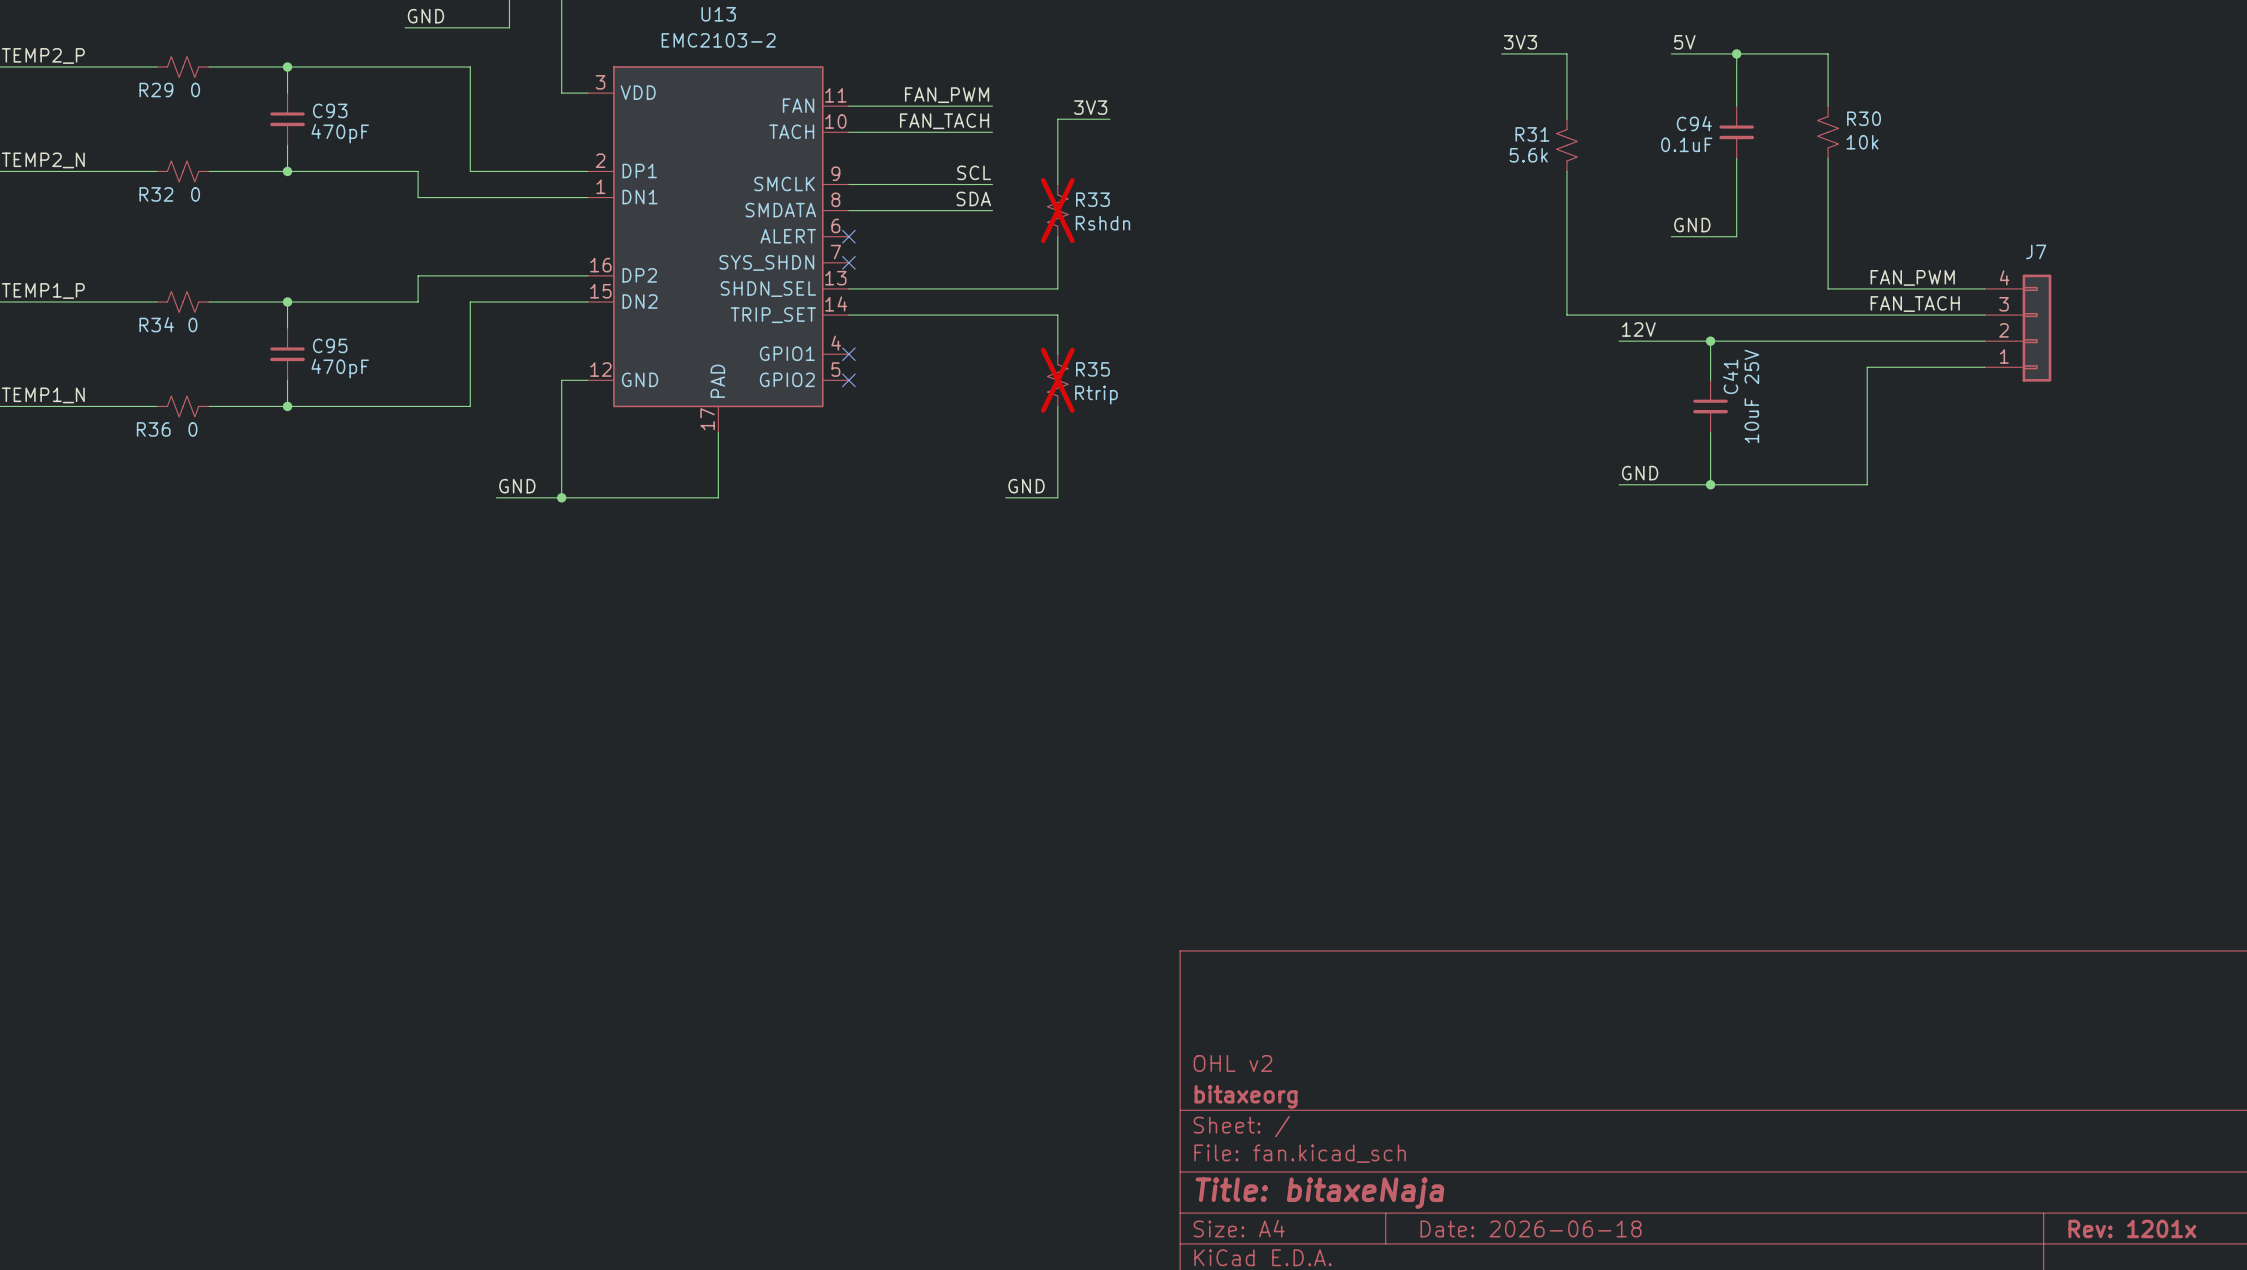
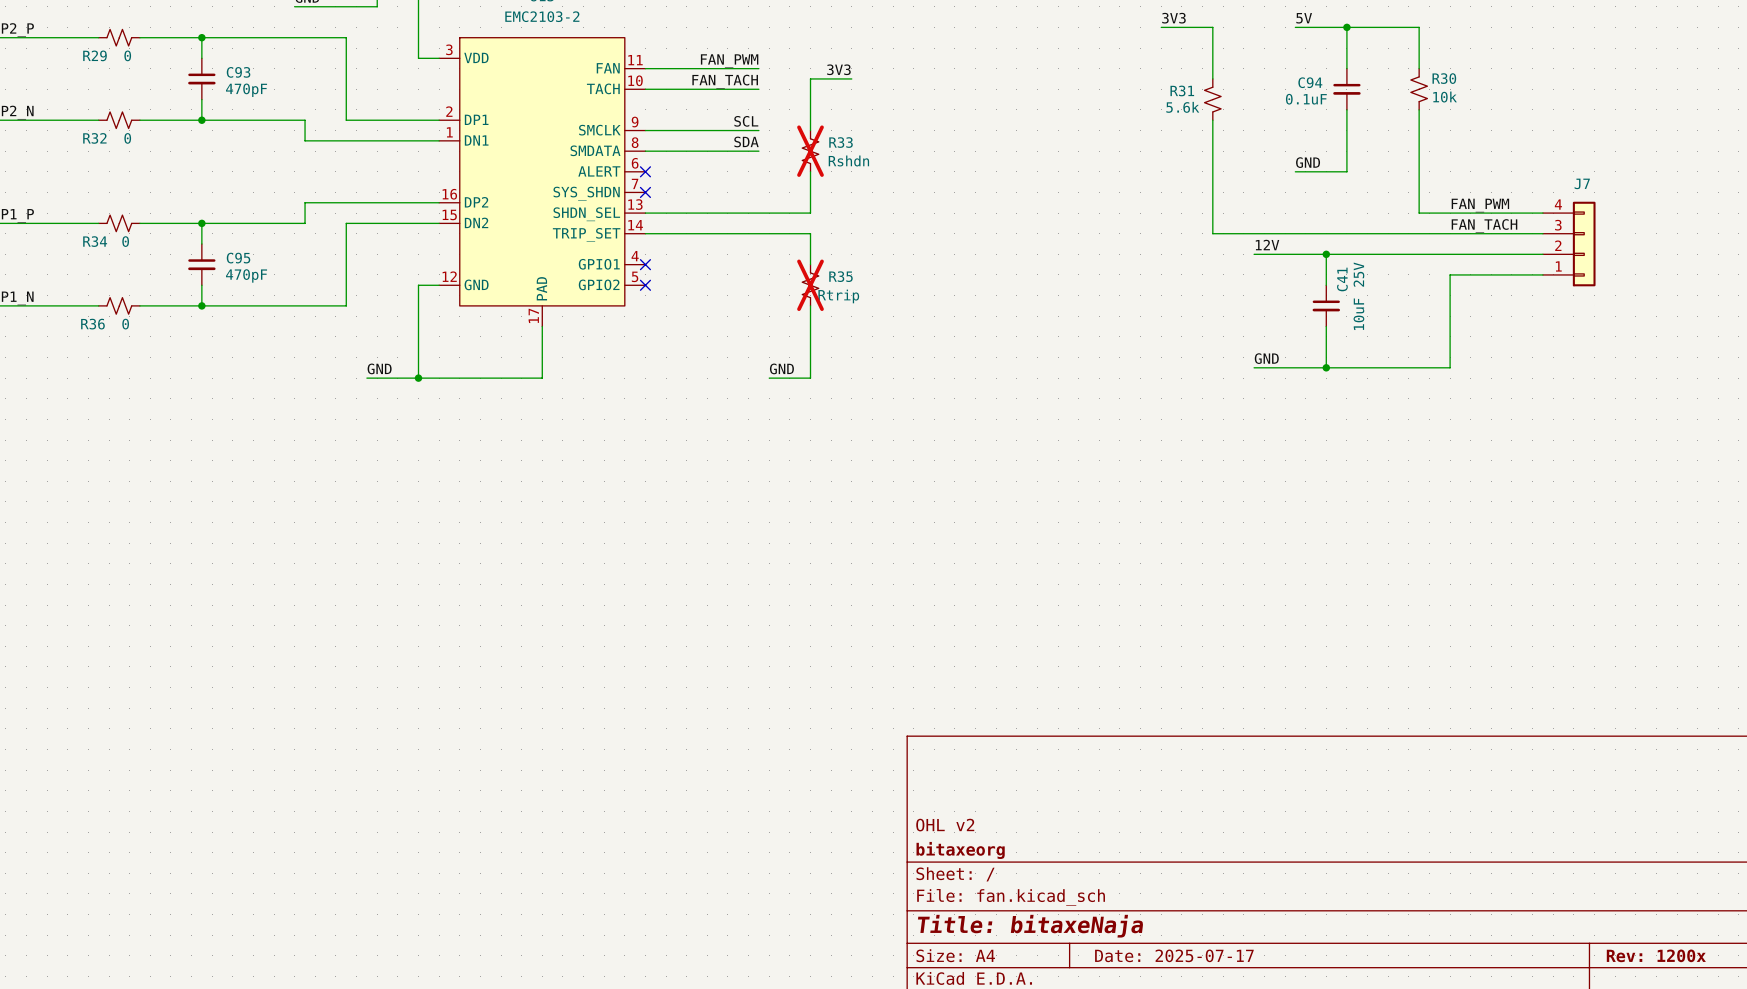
title block: Date: 2026-06-18 (1531, 1228) -> Date: 2025-07-17 (1174, 955)
title block: Rev: 1201x (2132, 1228) -> Rev: 1200x (1656, 955)

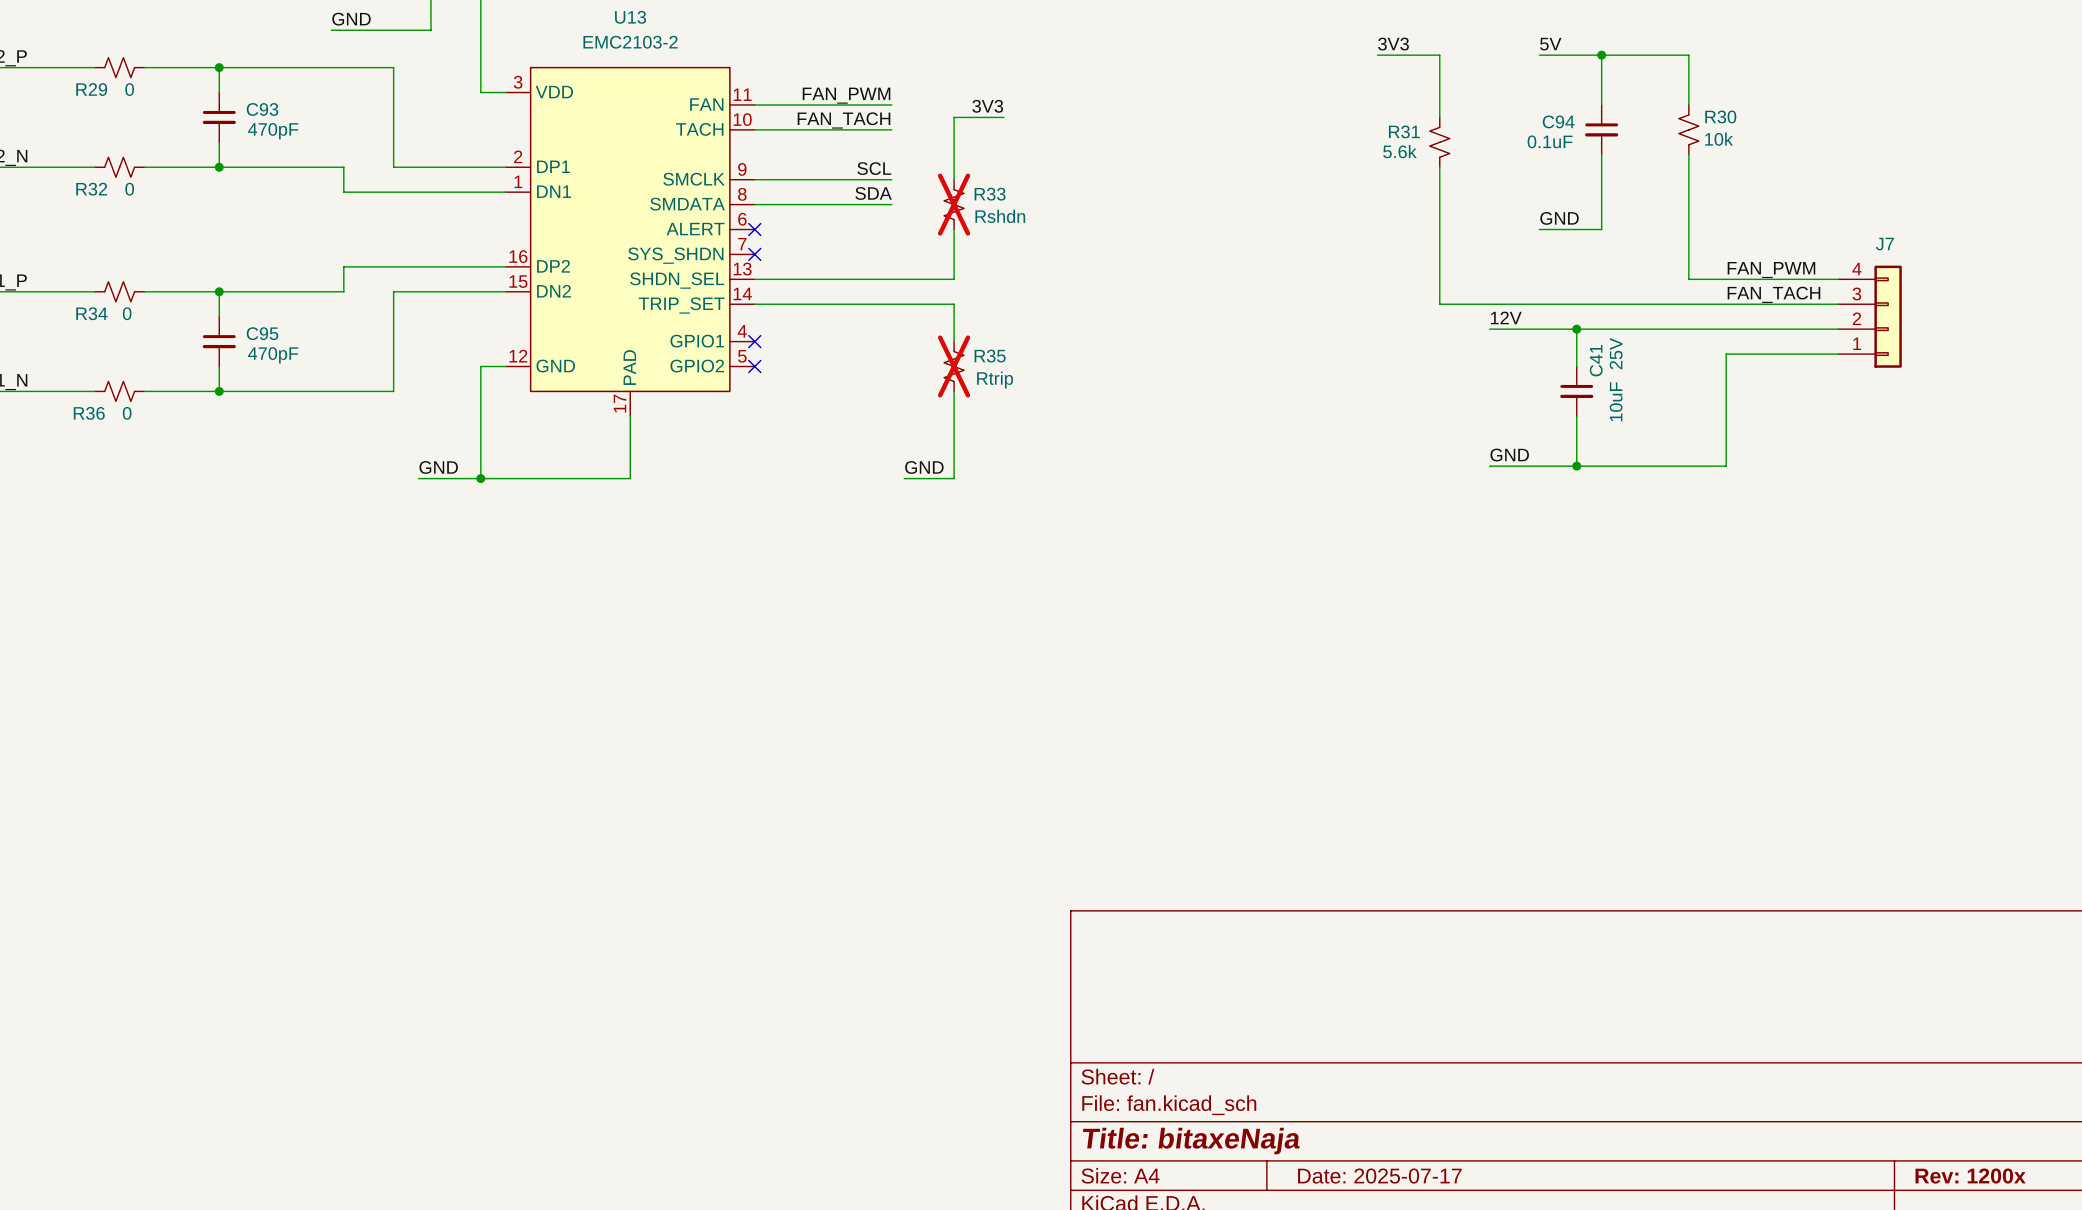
title block: OHL v2 (945, 825) -> none
title block: bitaxeorg (960, 850) -> none

